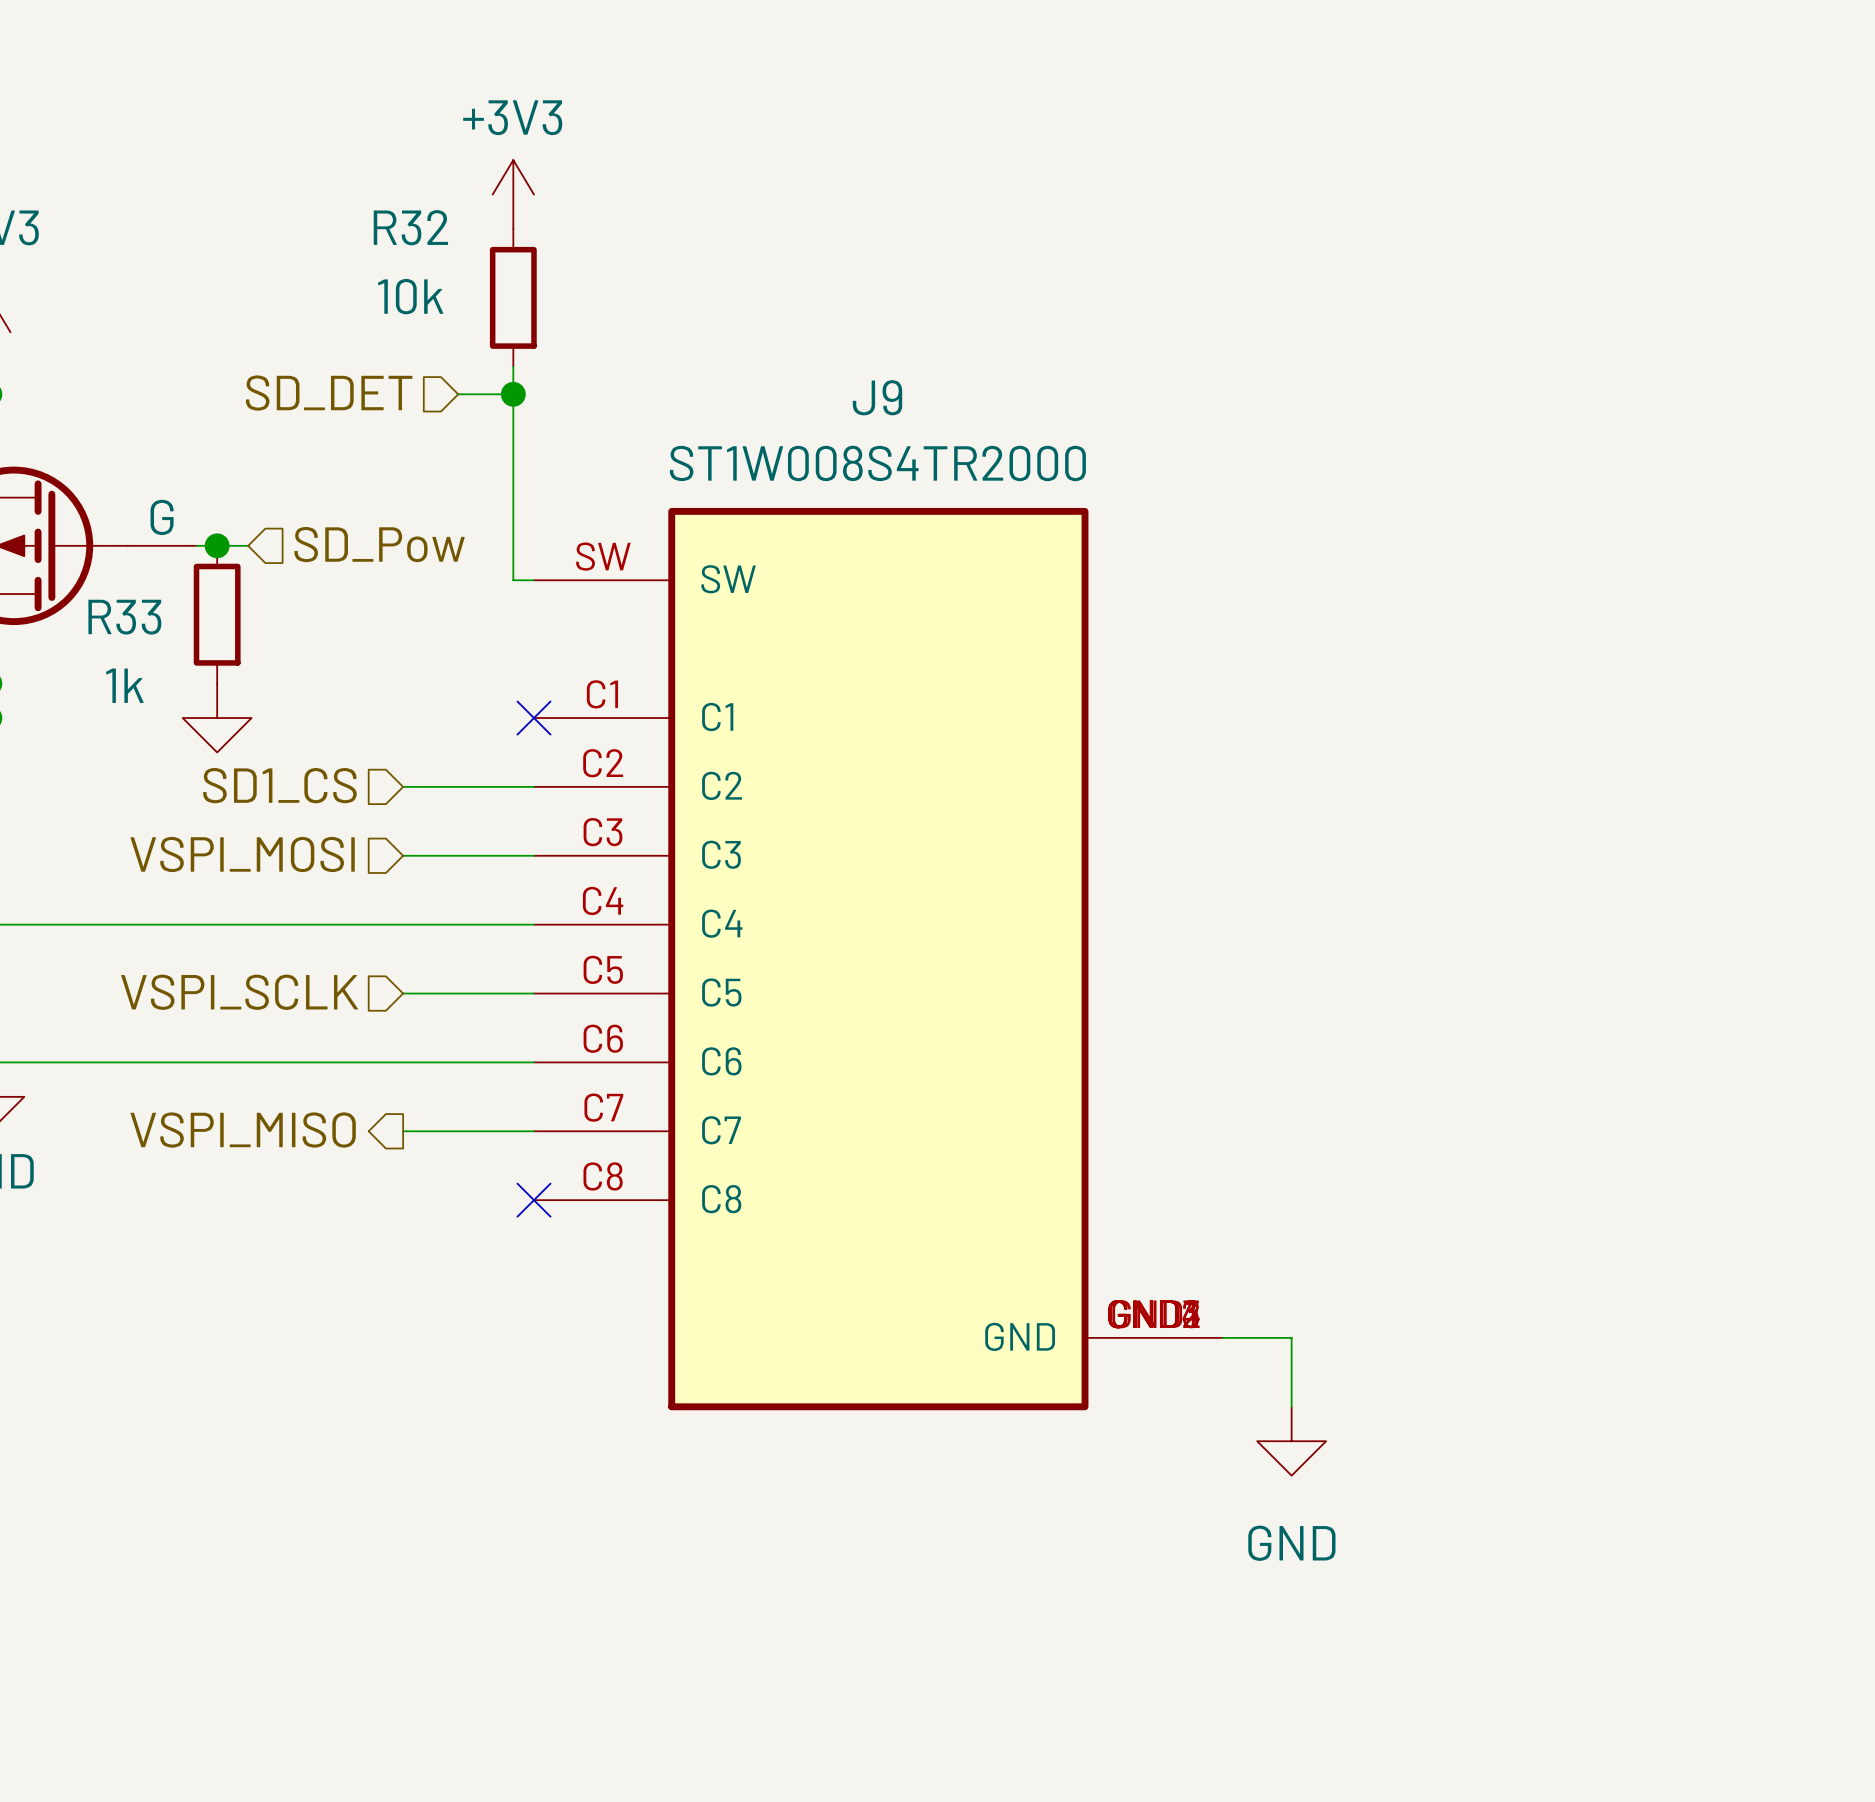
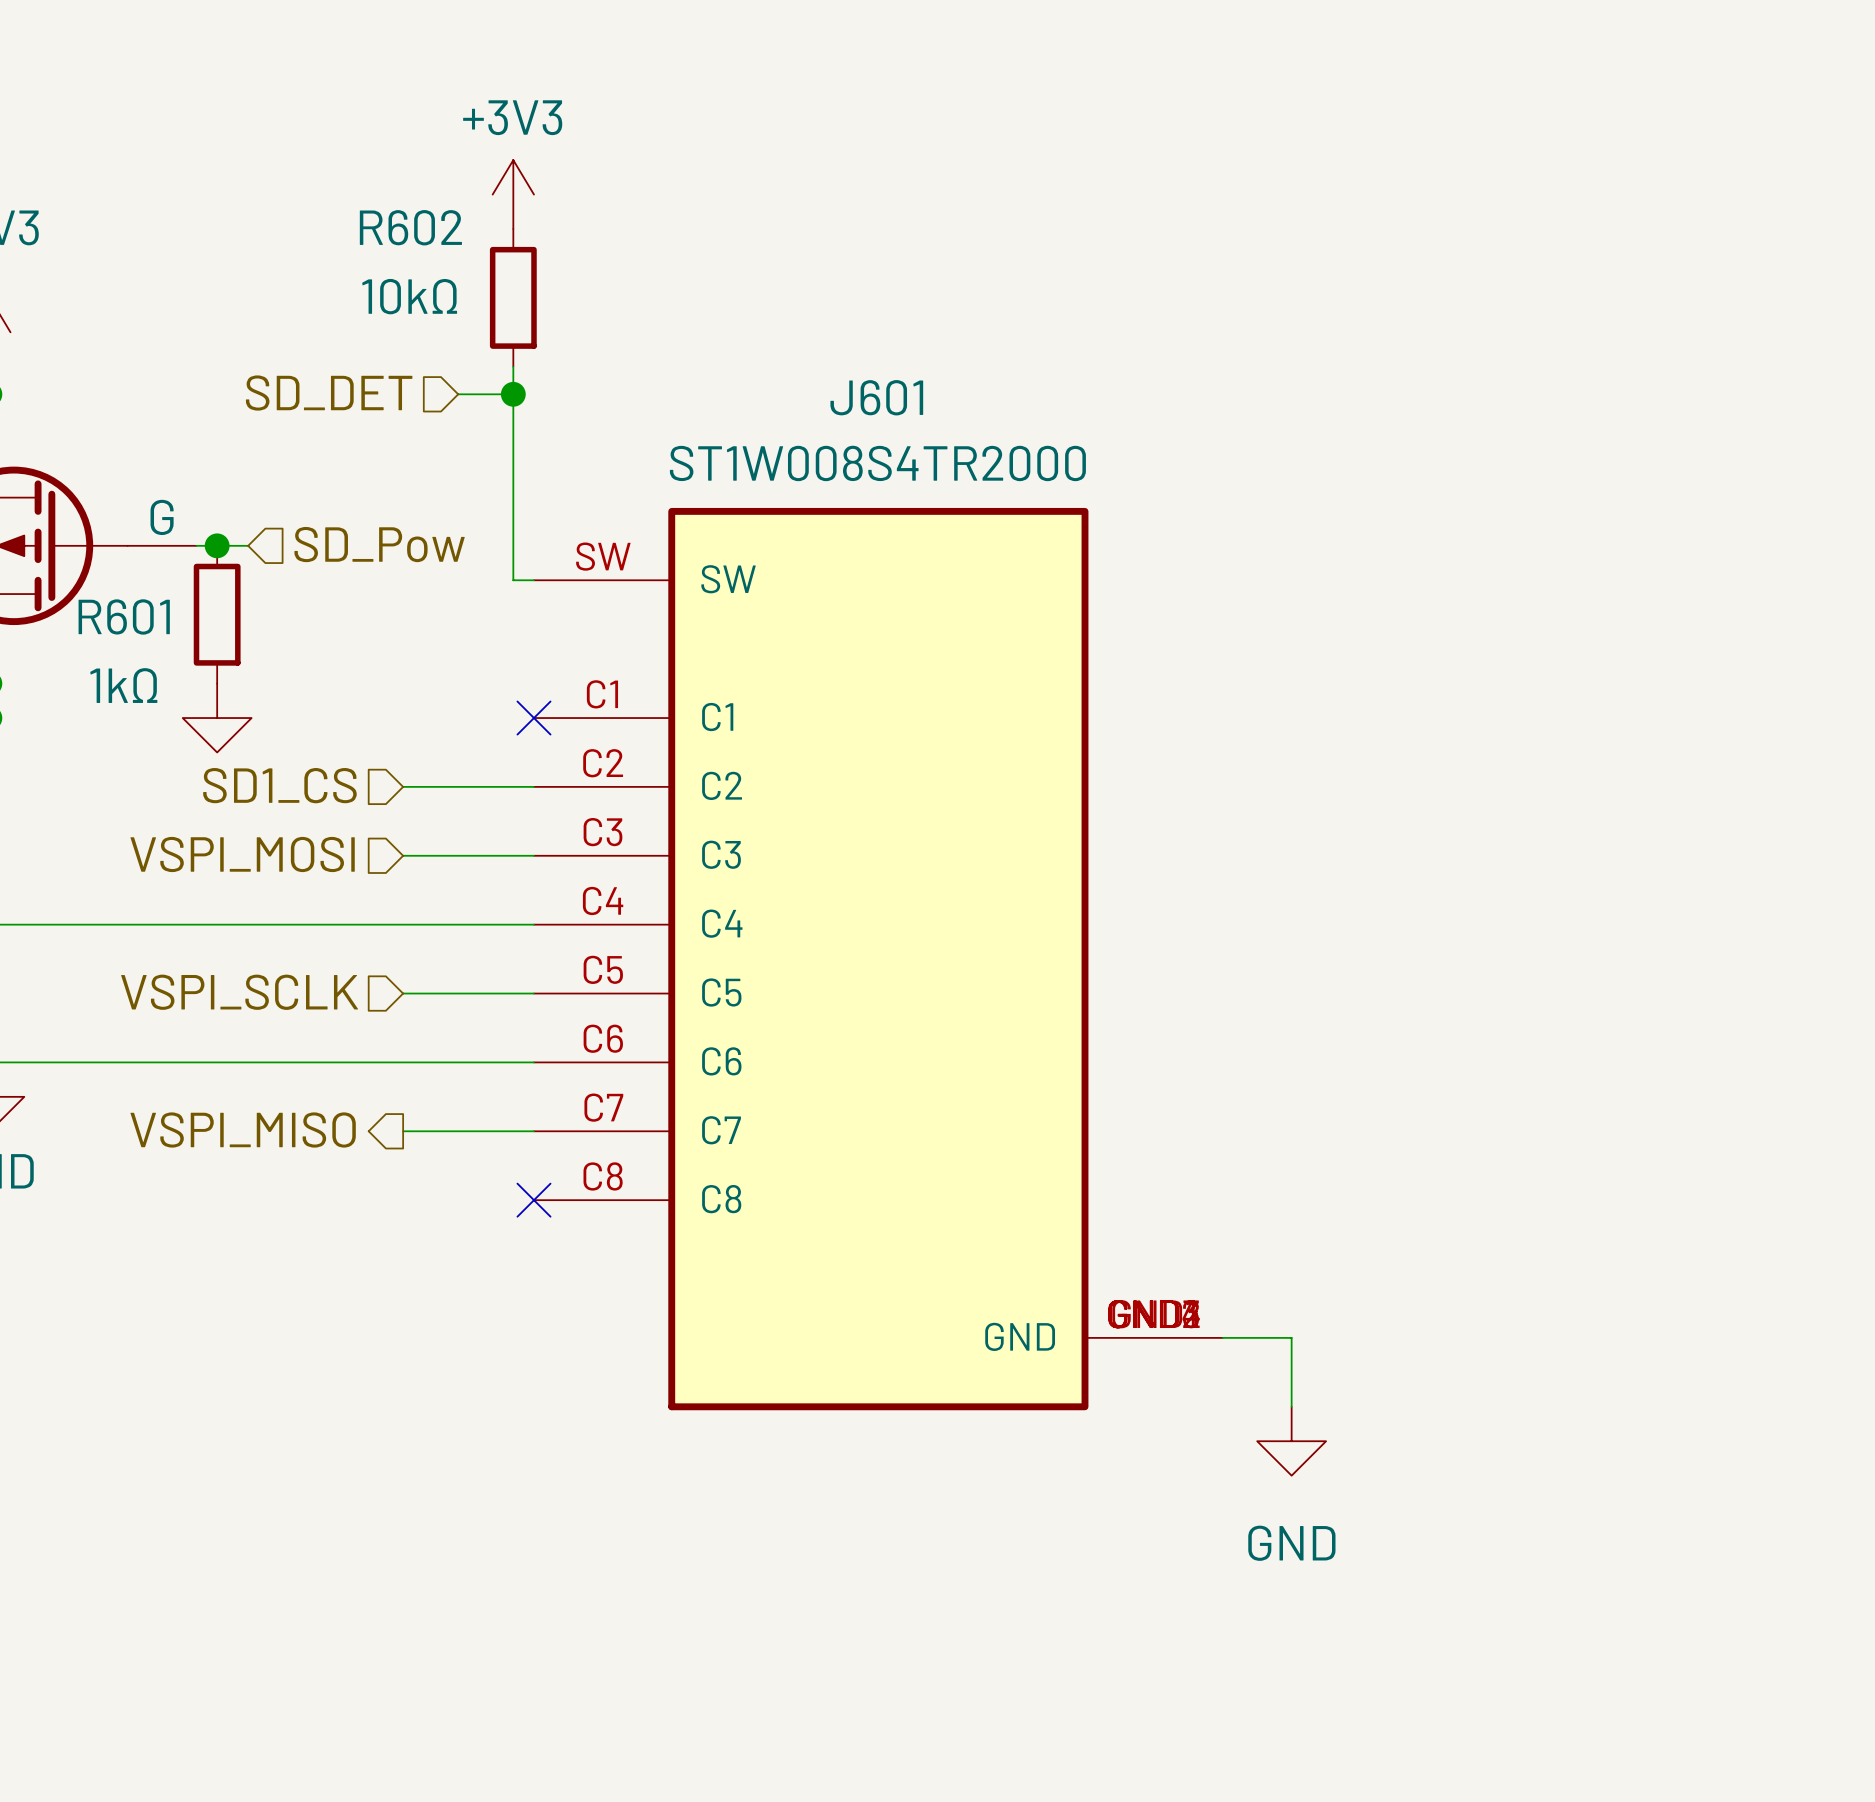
R32 name: R32 (410, 227) -> R602 (410, 227)
R32 value: 10k (410, 296) -> 10kΩ (409, 296)
J9 name: J9 (877, 397) -> J601 (876, 397)
R33 name: R33 (124, 617) -> R601 (124, 616)
R33 value: 1k (124, 685) -> 1kΩ (123, 685)

